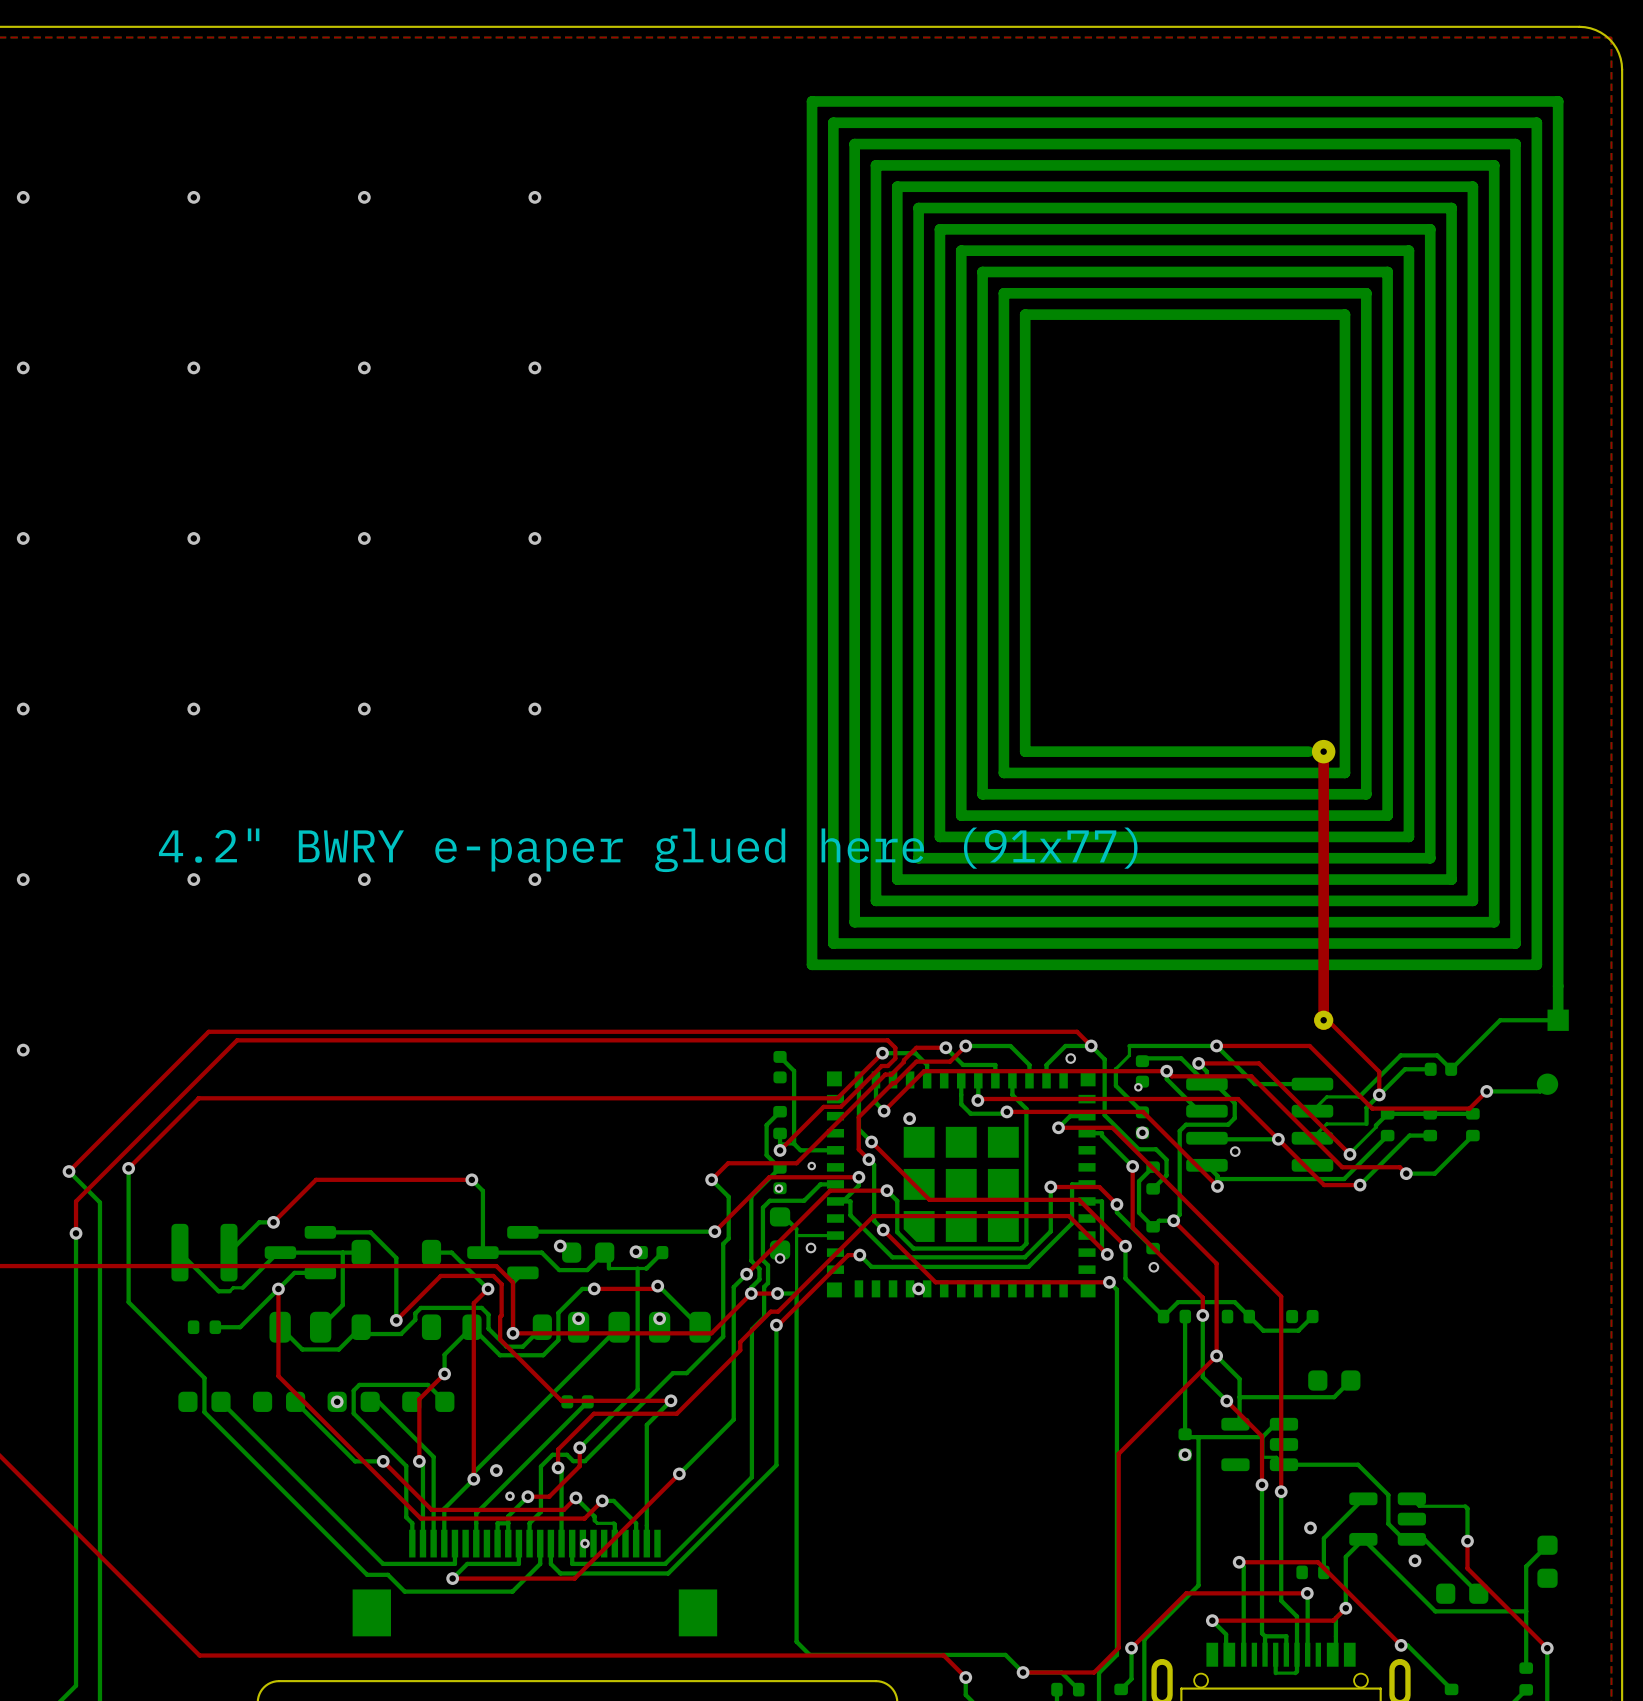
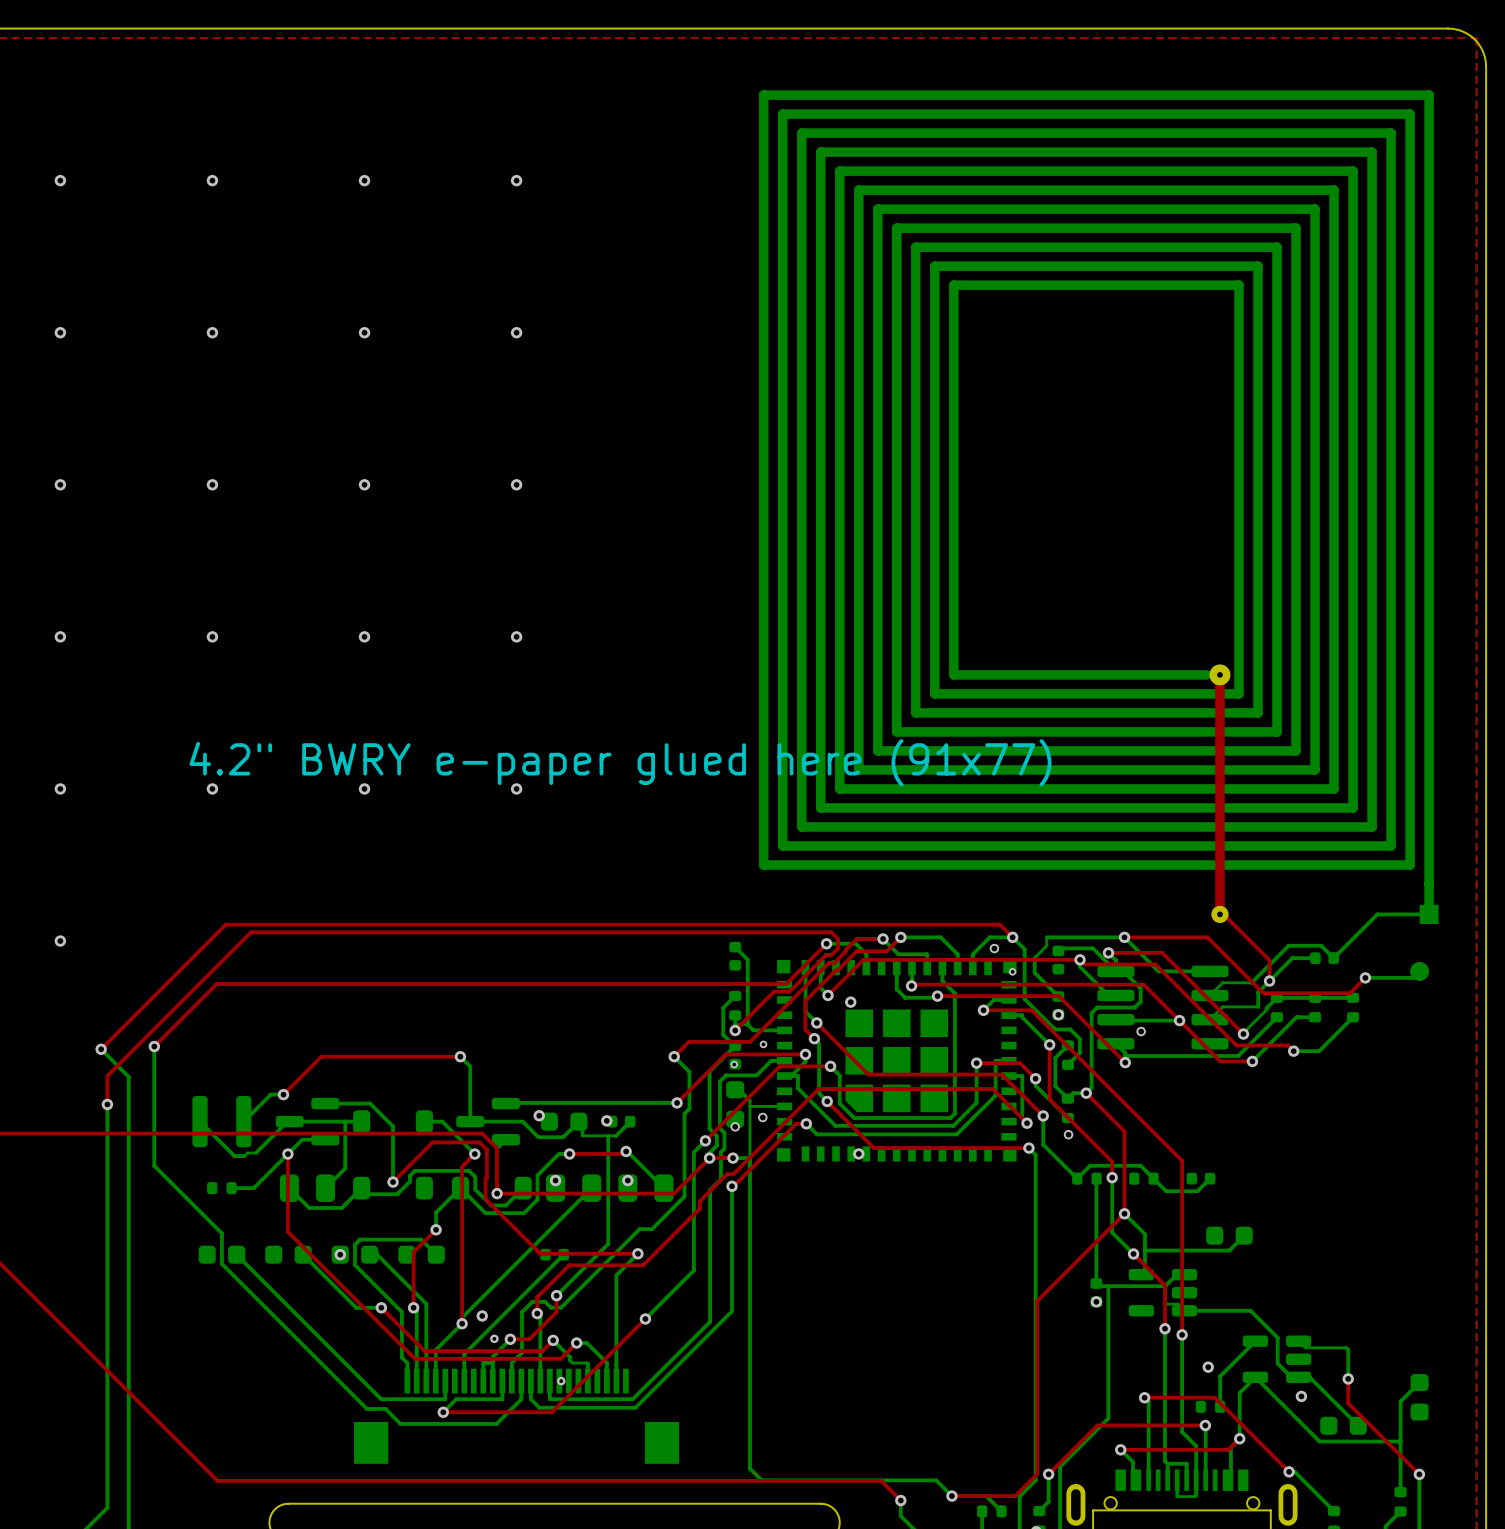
via position: (1138, 1087) -> (1012, 971)

